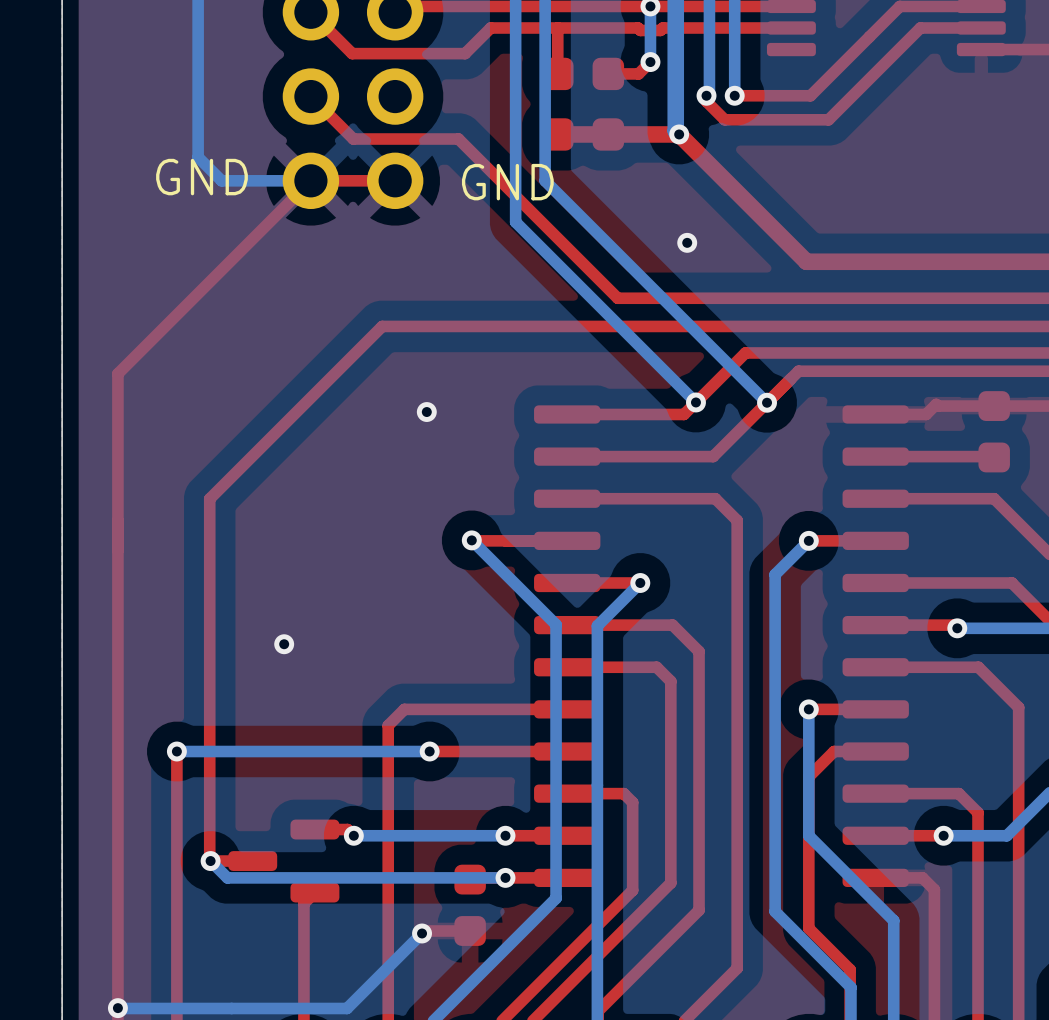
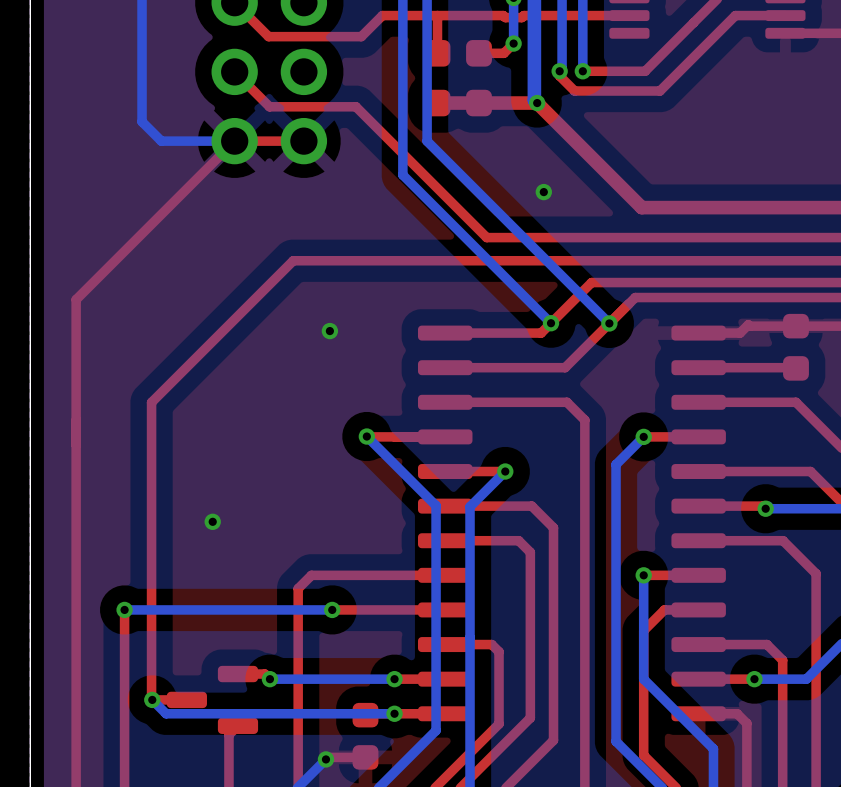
text: GND (201, 177) -> none
text: GND (507, 182) -> none

